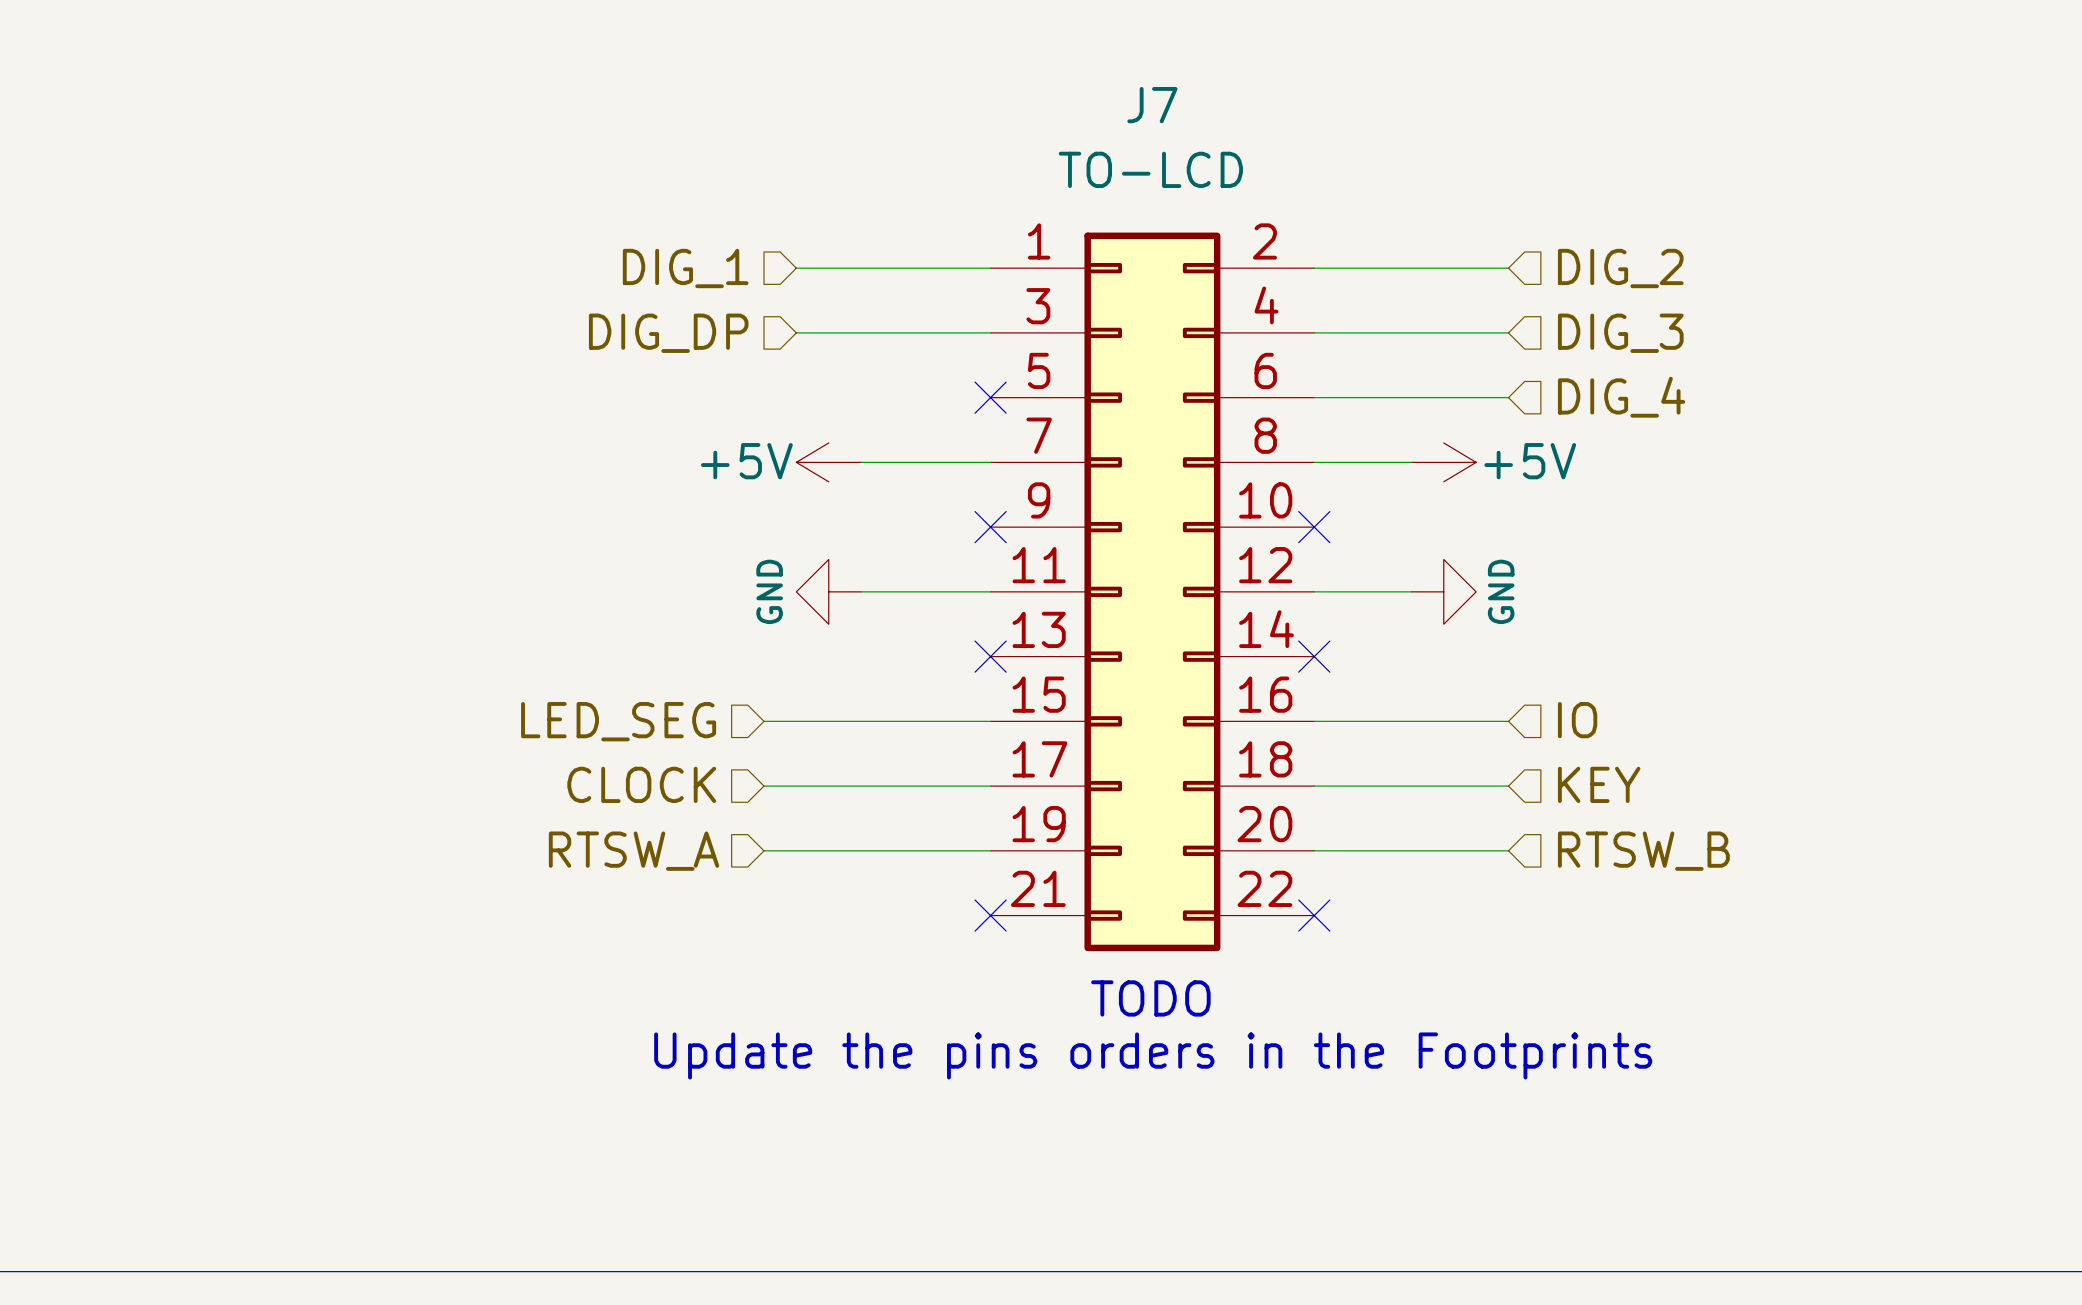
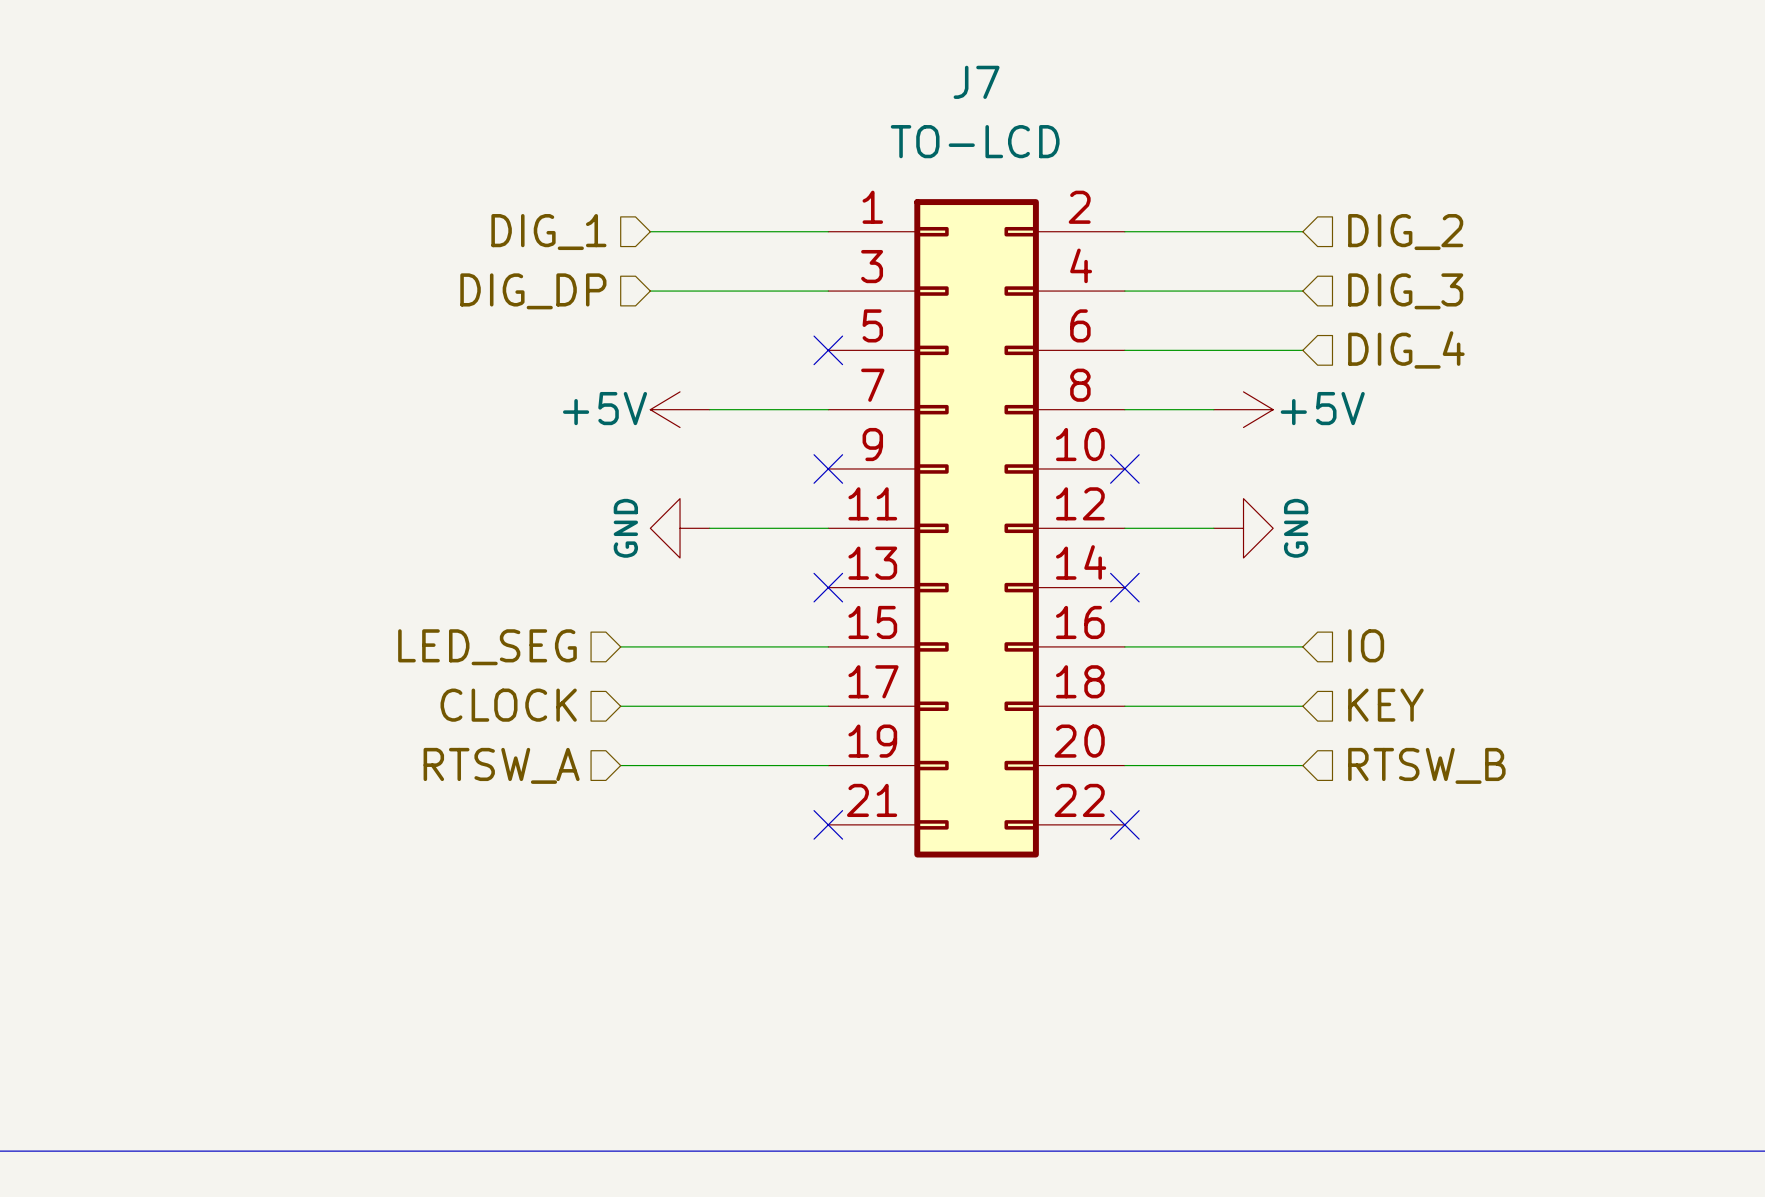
text: TODO (1150, 998) -> none
text: Update the pins orders in the Footprints (1153, 1055) -> none

